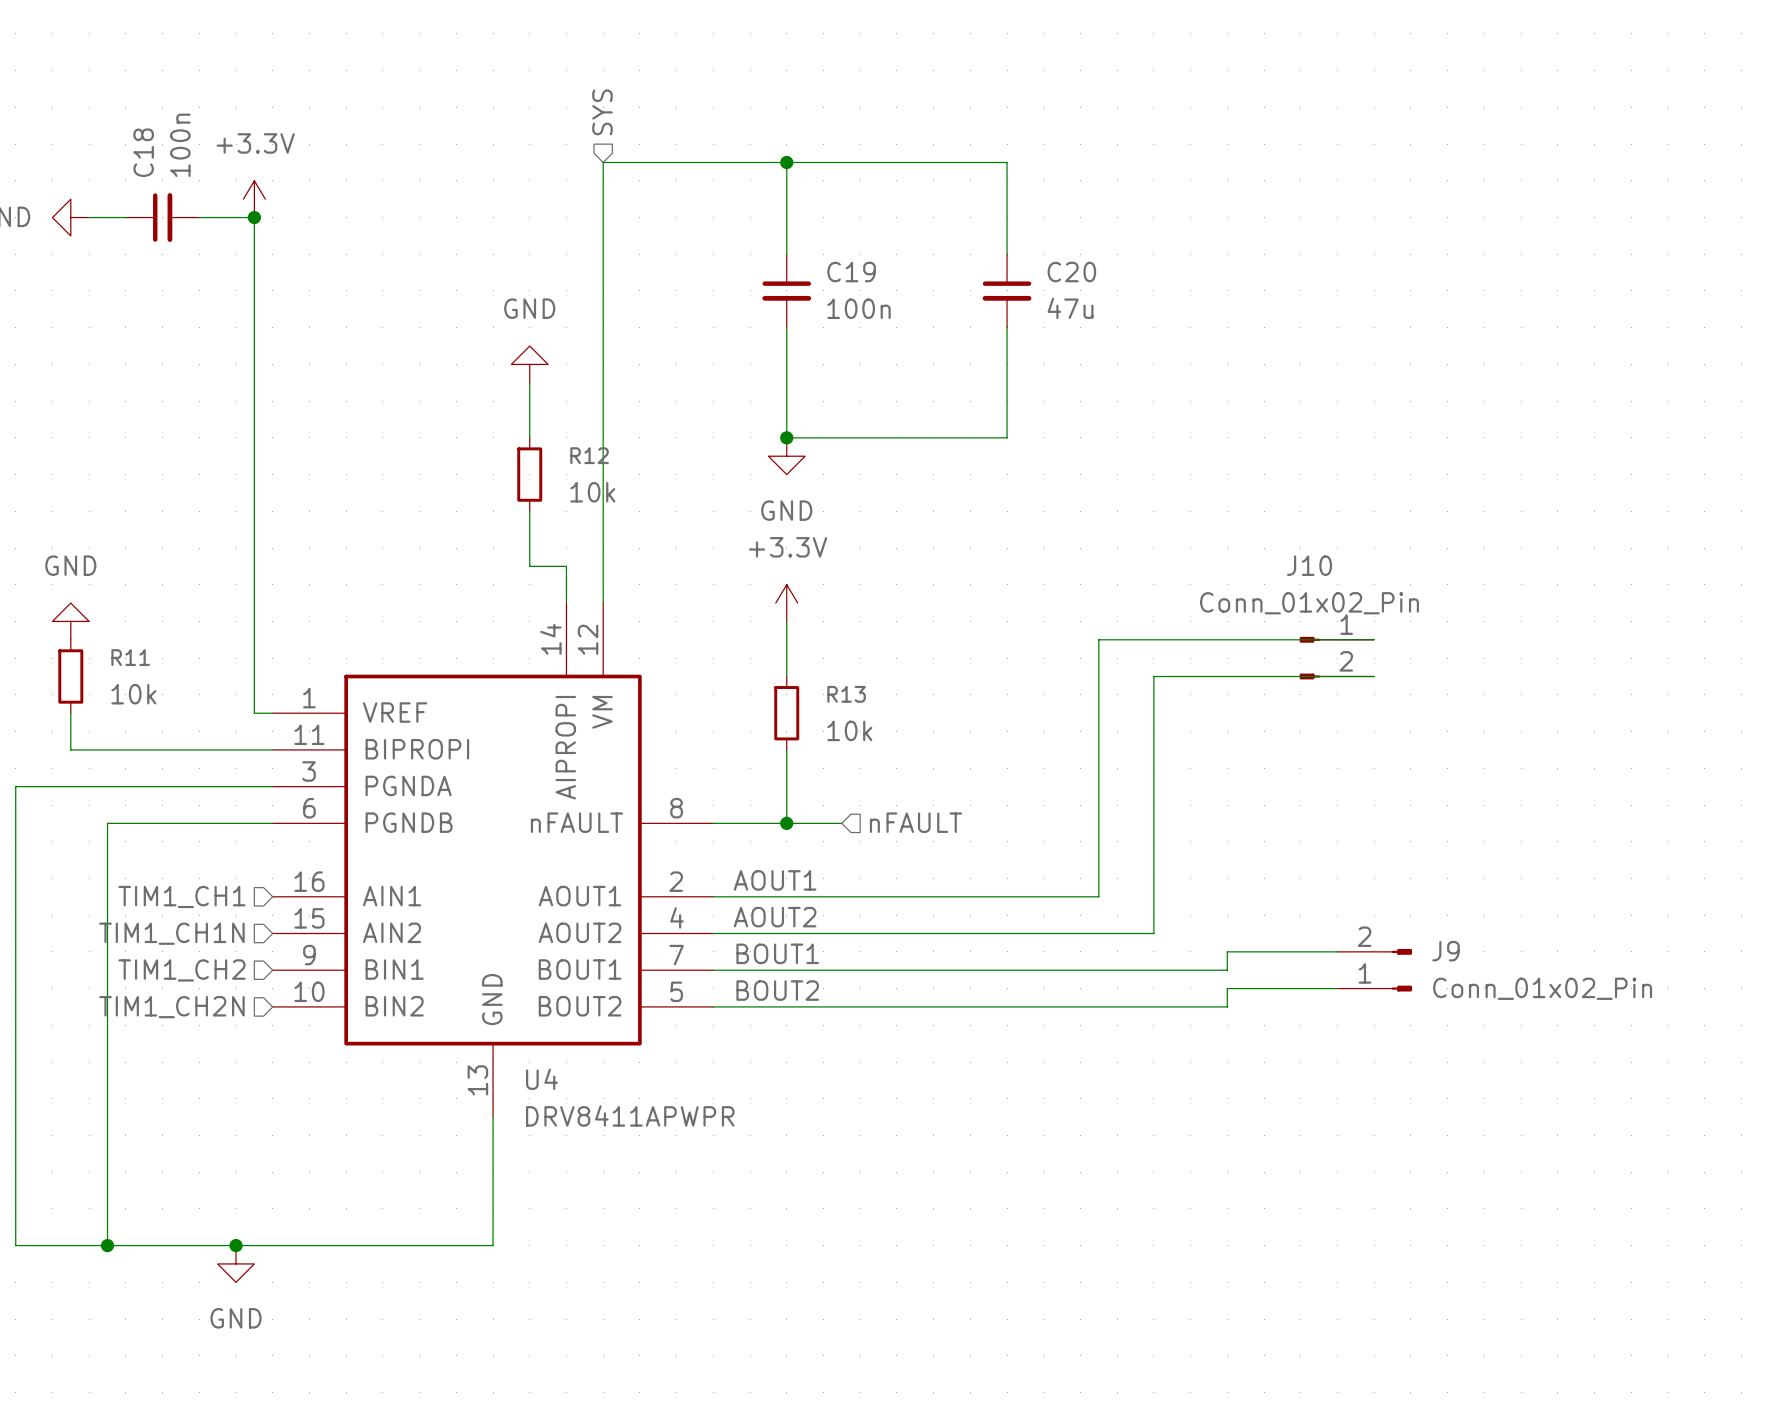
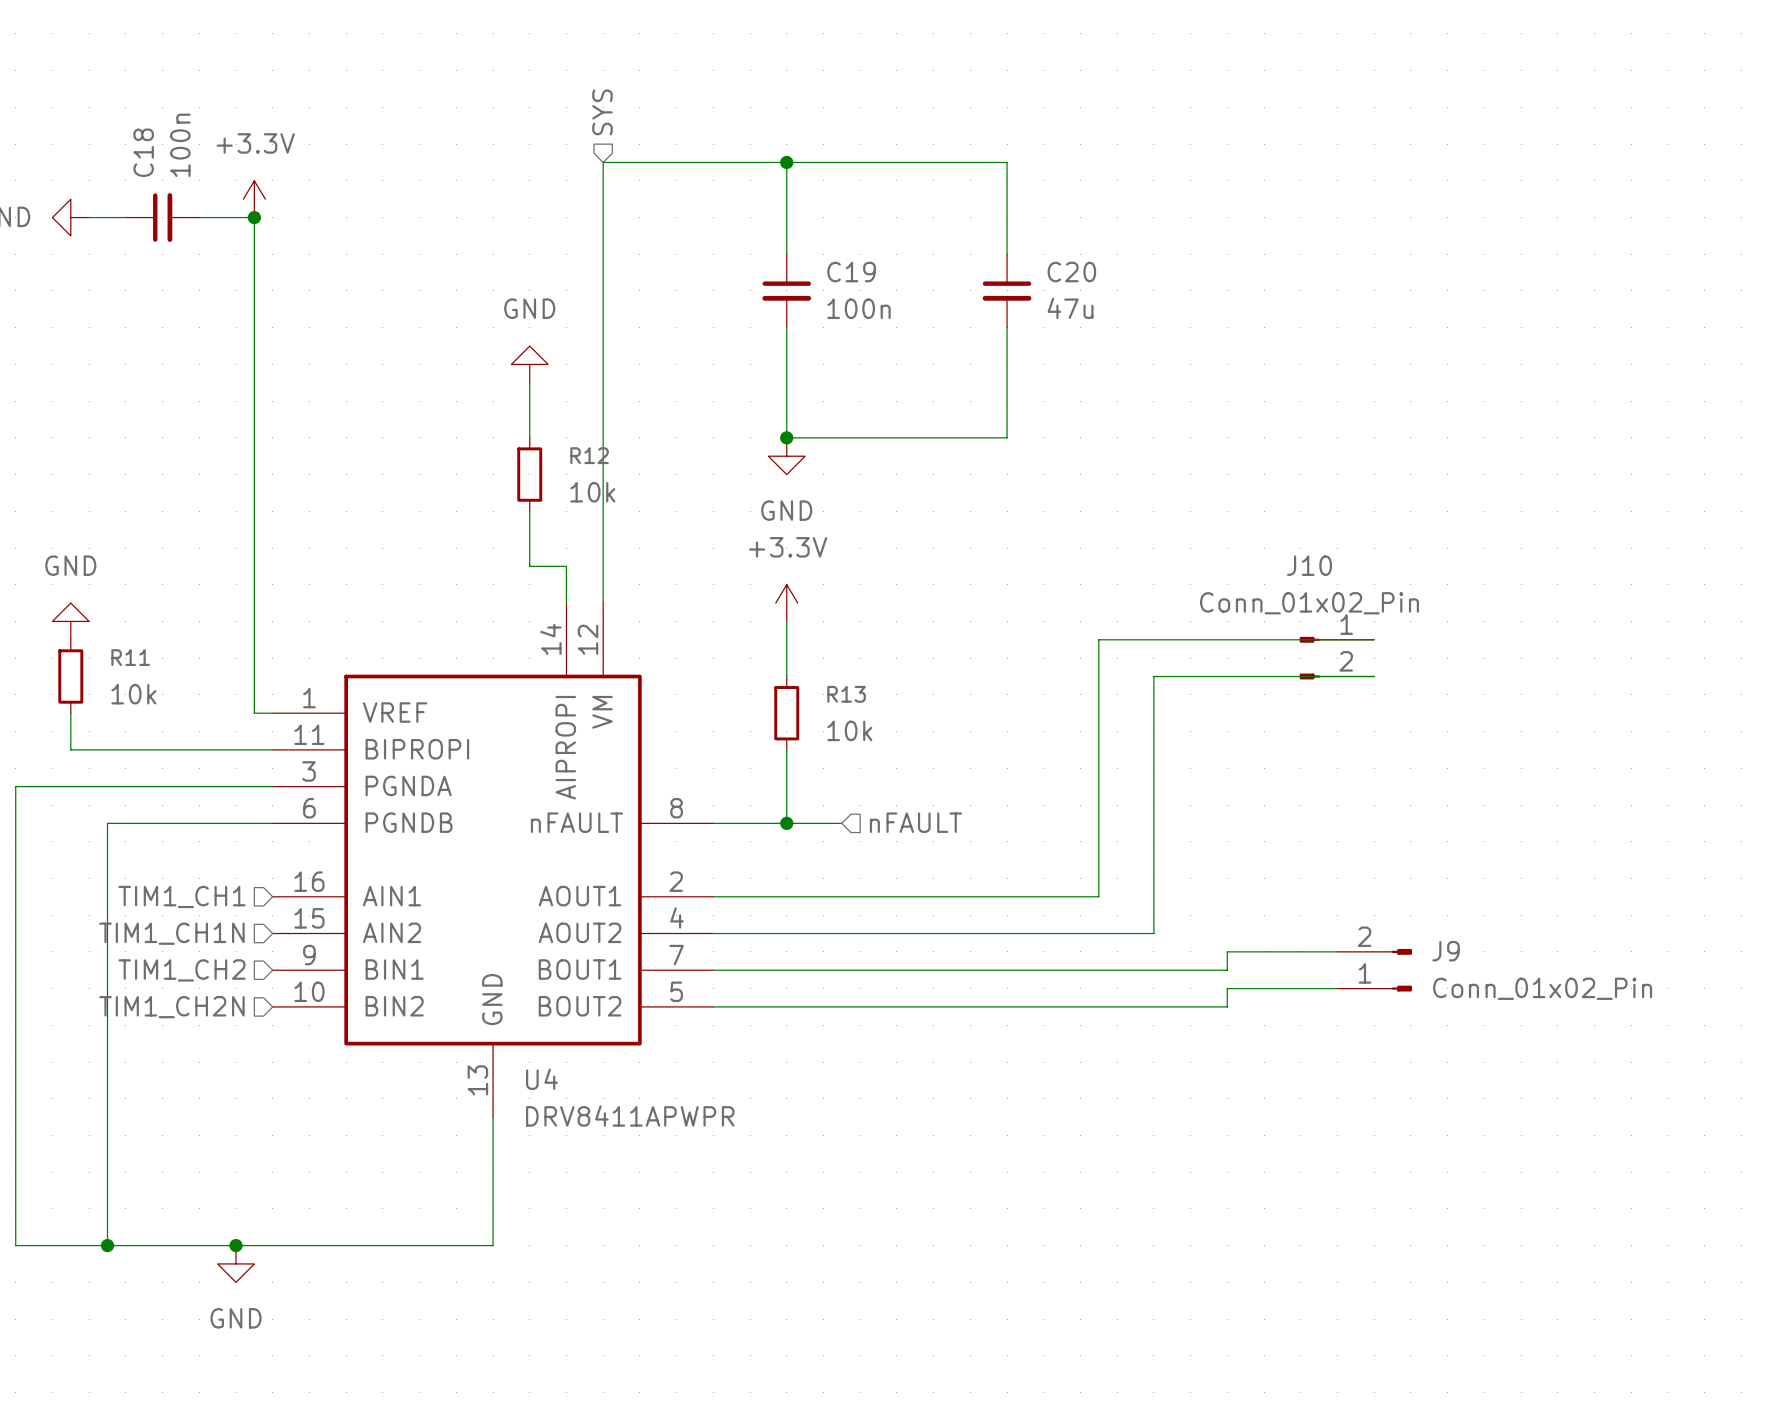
label: AOUT1 (775, 880) -> none
label: AOUT2 (775, 917) -> none
label: BOUT1 (777, 953) -> none
label: BOUT2 (777, 990) -> none

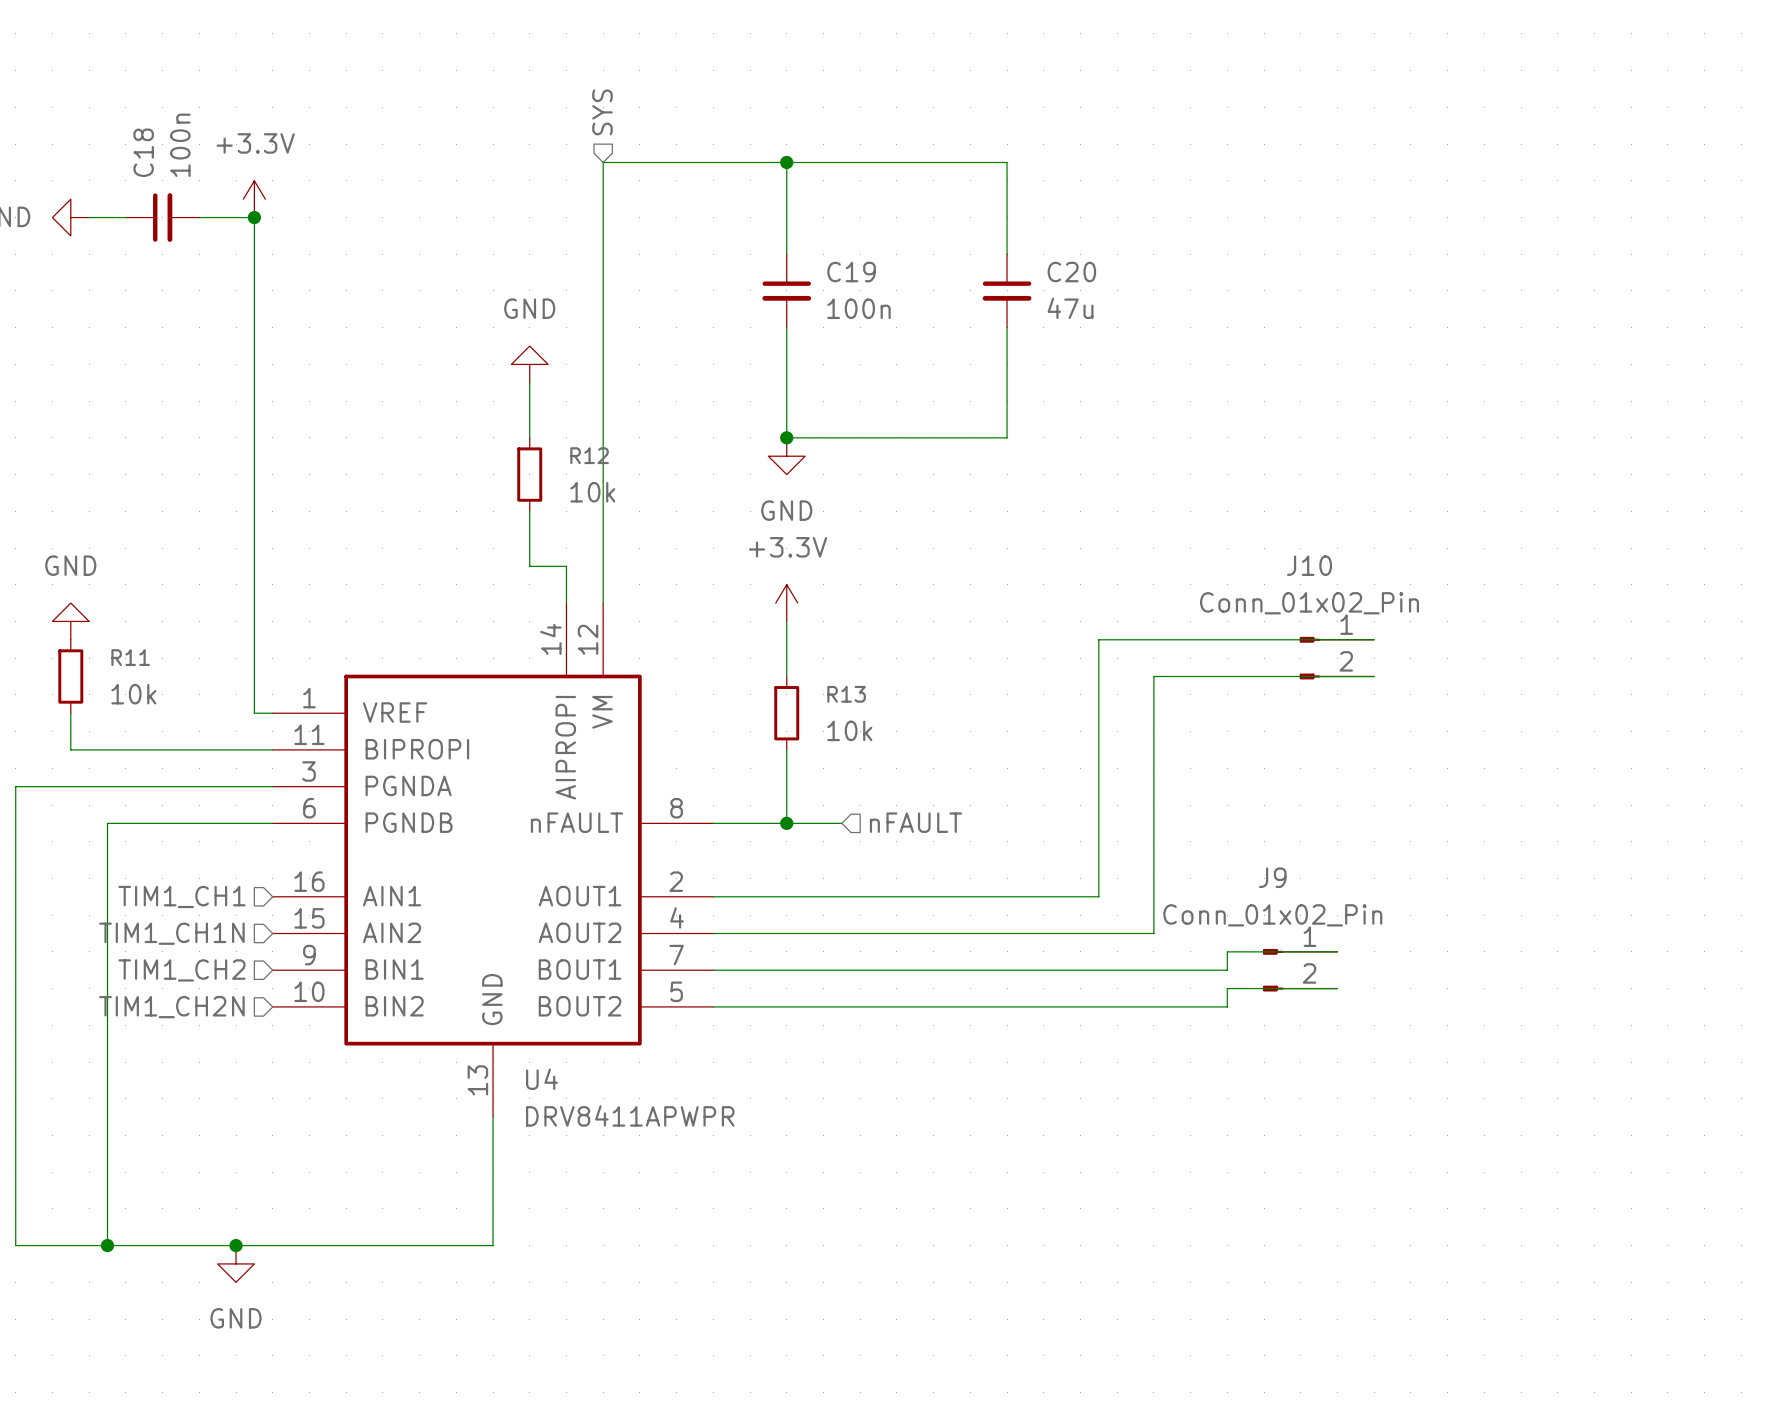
J9 name position: J9 (1446, 951) -> J9 (1272, 877)
J9 position: (1374, 970) -> (1300, 970)
J9 rotation: 0° (1401, 970) -> 180° (1273, 970)
J9 value position: Conn_01x02_Pin (1542, 988) -> Conn_01x02_Pin (1272, 915)

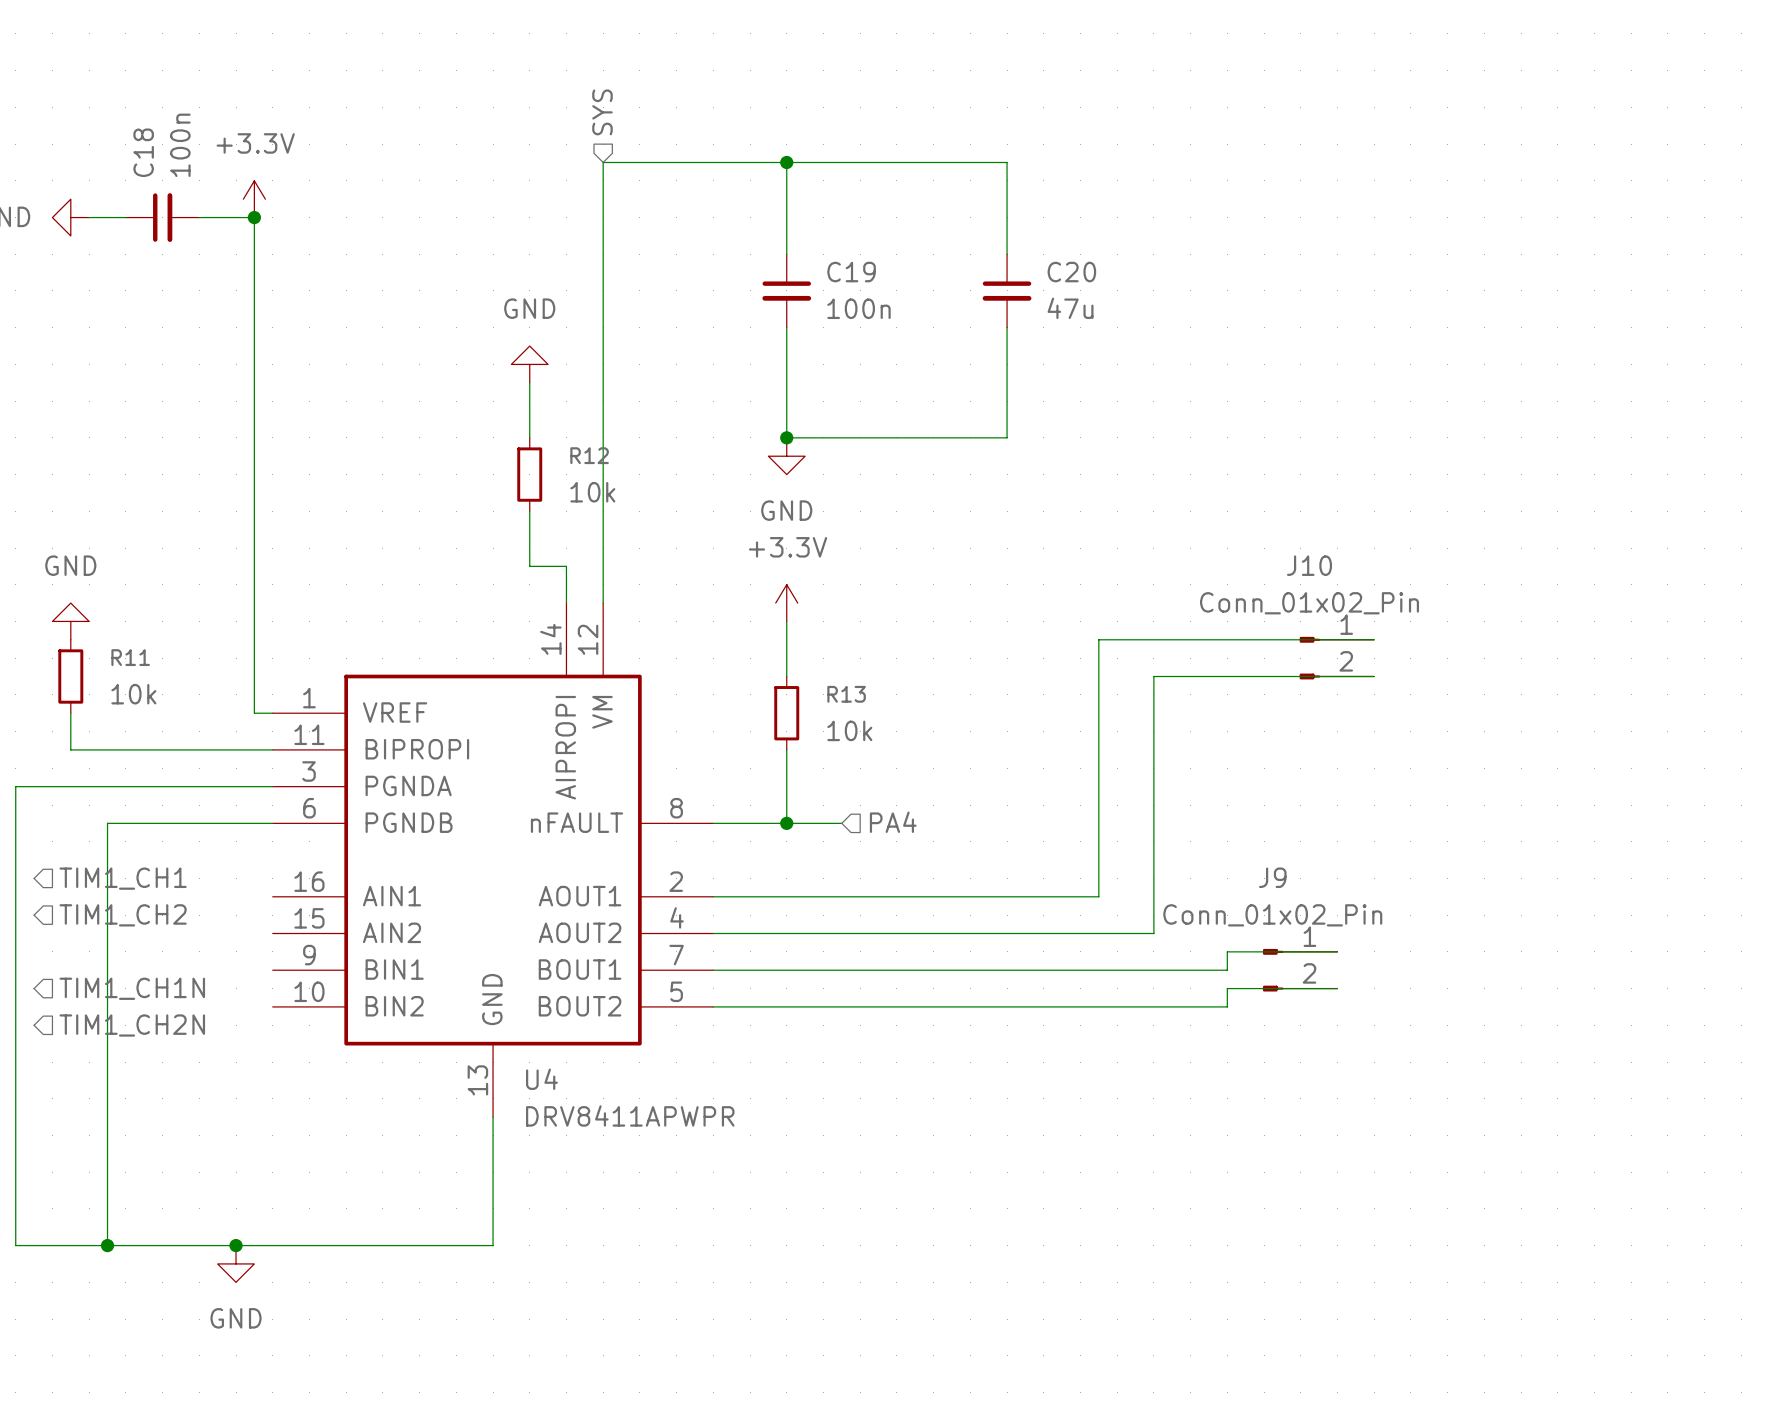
hierarchical label: nFAULT (915, 822) -> PA4 (893, 822)
hierarchical label rotation: 0° (181, 896) -> 180° (123, 878)
hierarchical label rotation: 0° (171, 933) -> 180° (132, 988)
hierarchical label rotation: 0° (181, 970) -> 180° (123, 915)
hierarchical label rotation: 0° (171, 1007) -> 180° (132, 1025)

